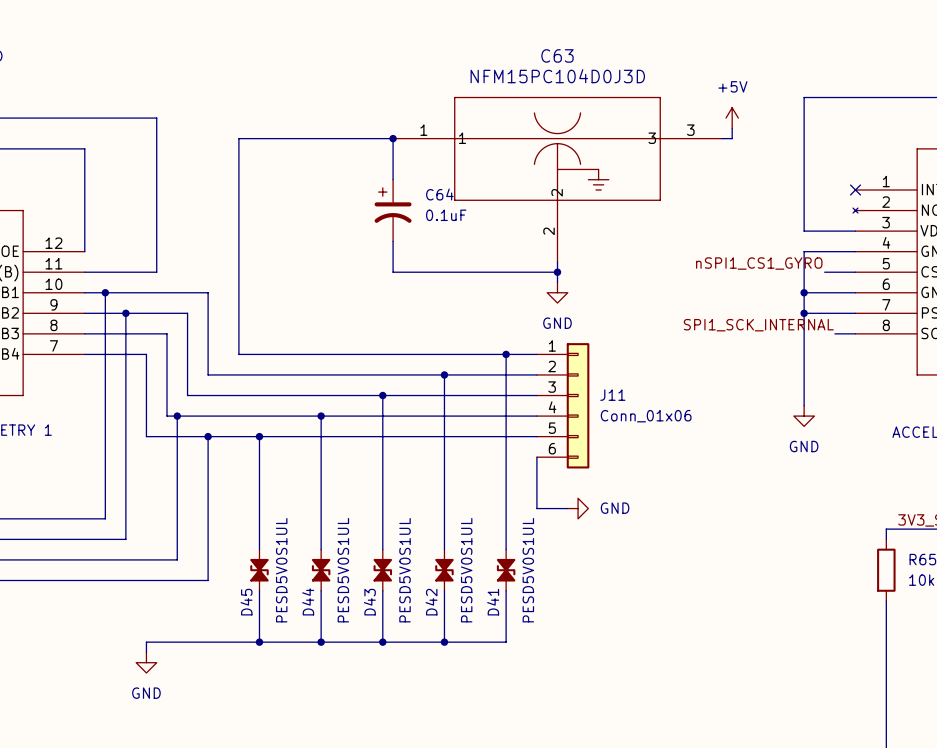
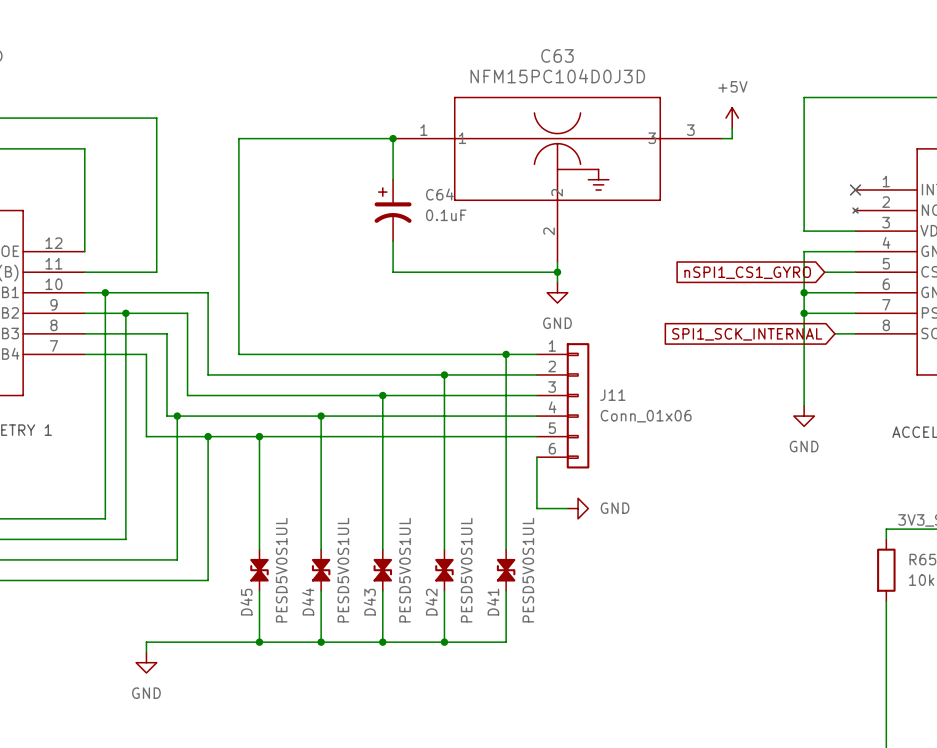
label: nSPI1_CS1_GYRO (759, 263) -> none
global label: none -> nSPI1_CS1_GYRO (747, 272)
label: SPI1_SCK_INTERNAL (758, 325) -> none
global label: none -> SPI1_SCK_INTERNAL (747, 334)

